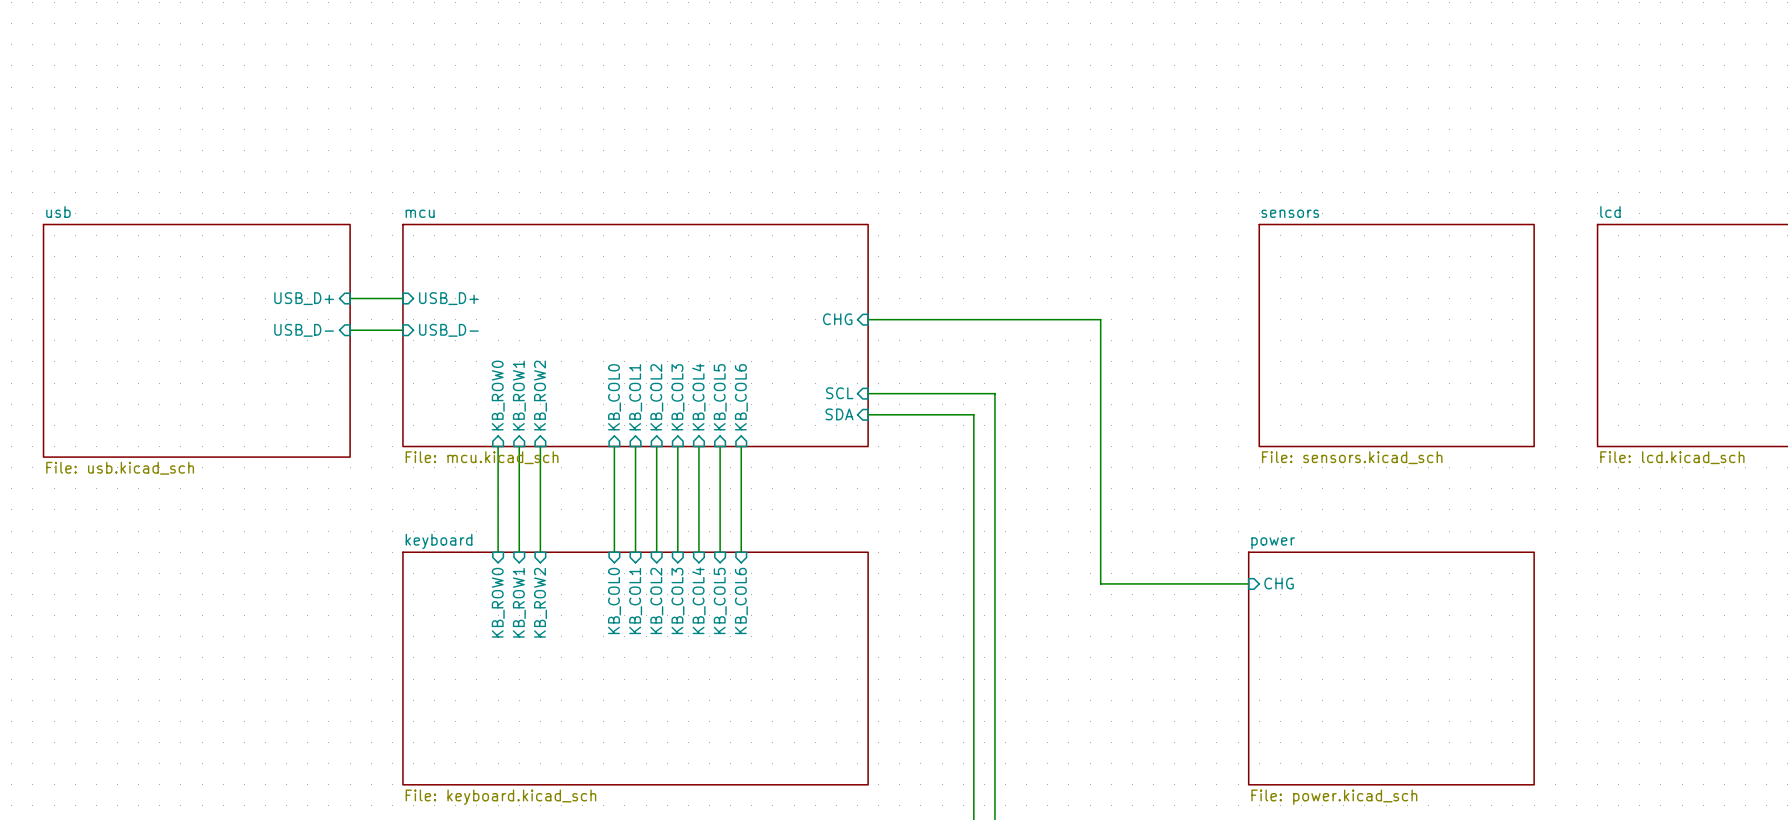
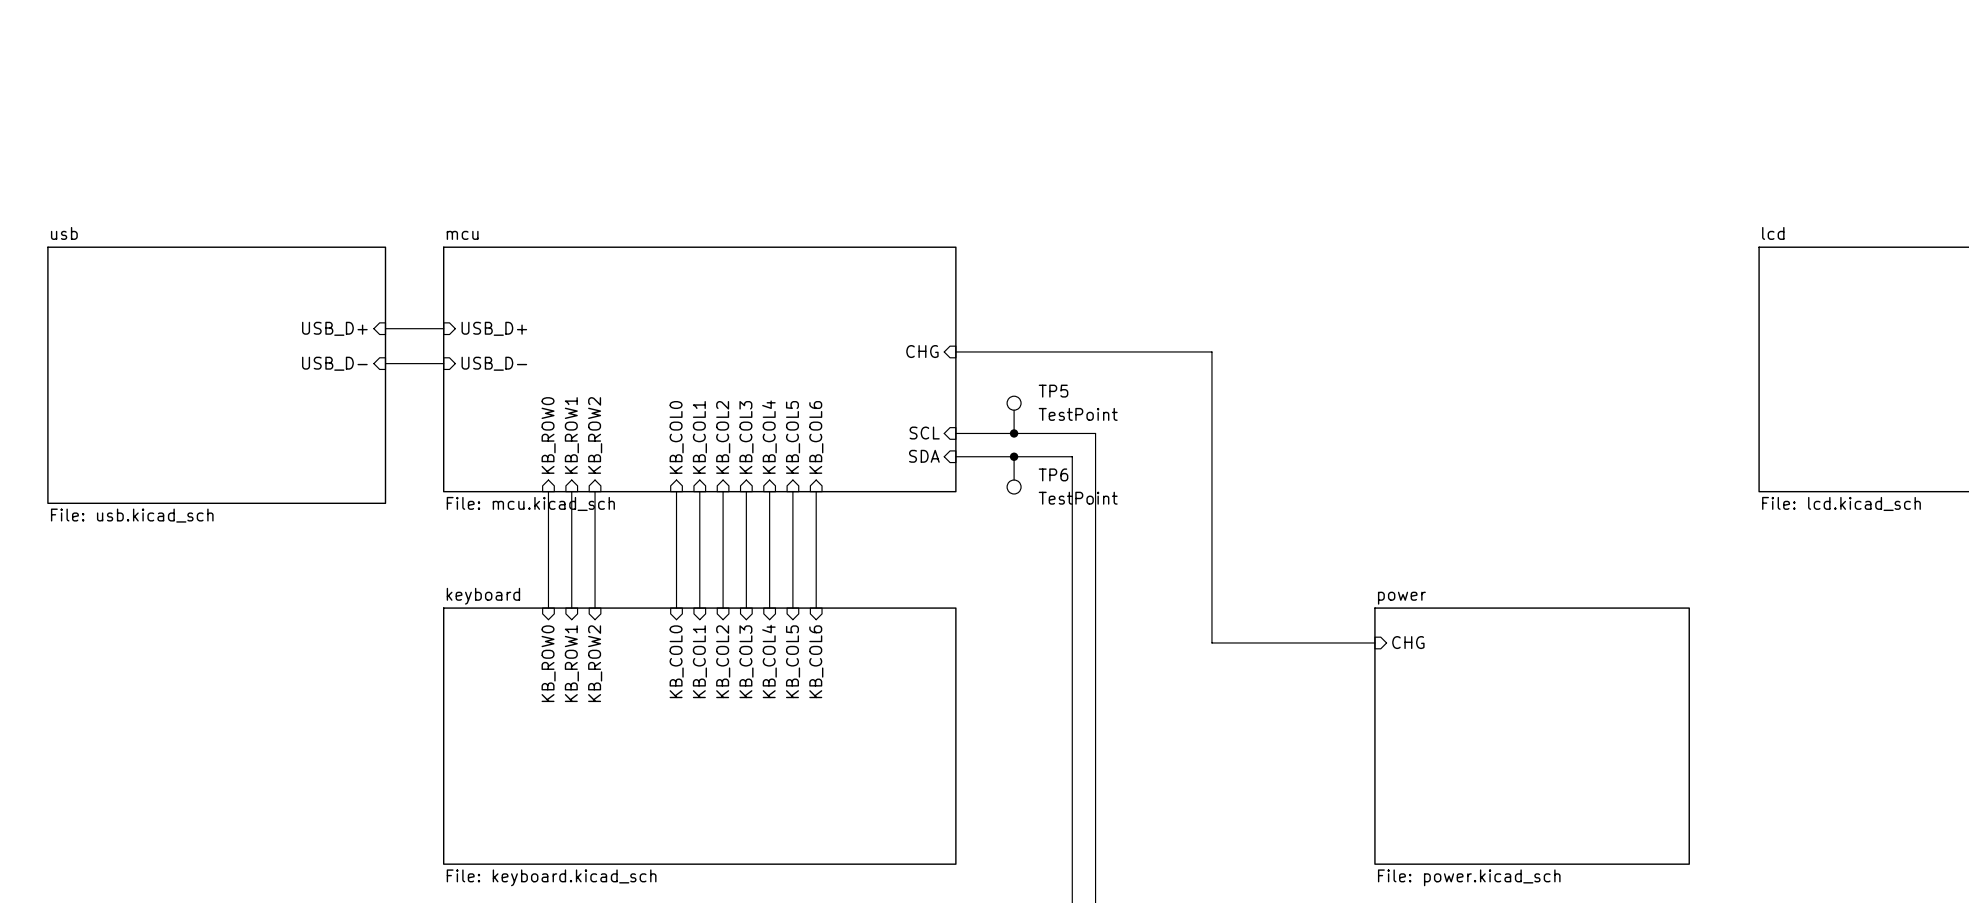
sheet sensors: File: sensors.kicad_sch (1396, 335) -> none
TP5: none -> TestPoint (1014, 414)
junction: none -> (1014, 433)
junction: none -> (1014, 456)
TP6: none -> TestPoint (1014, 475)

